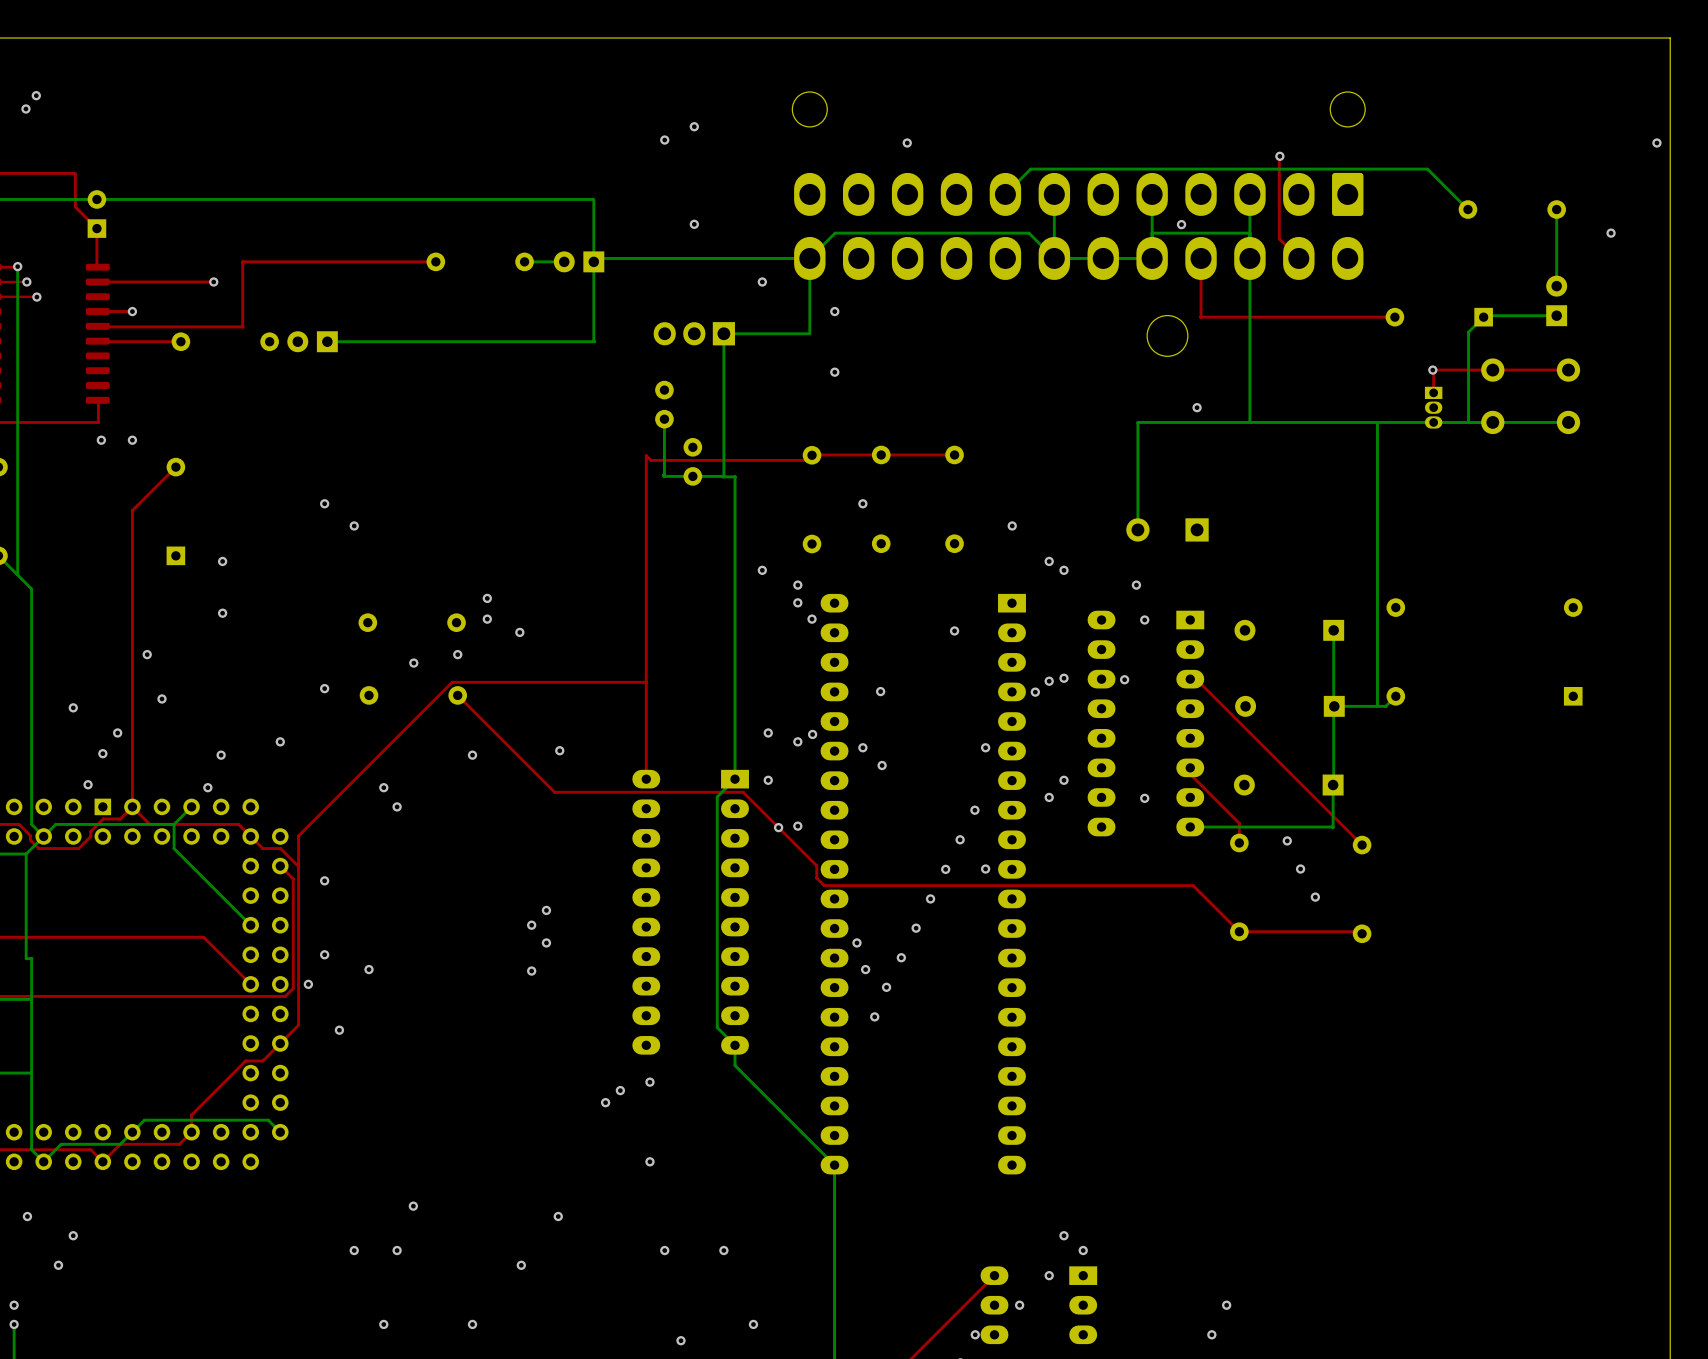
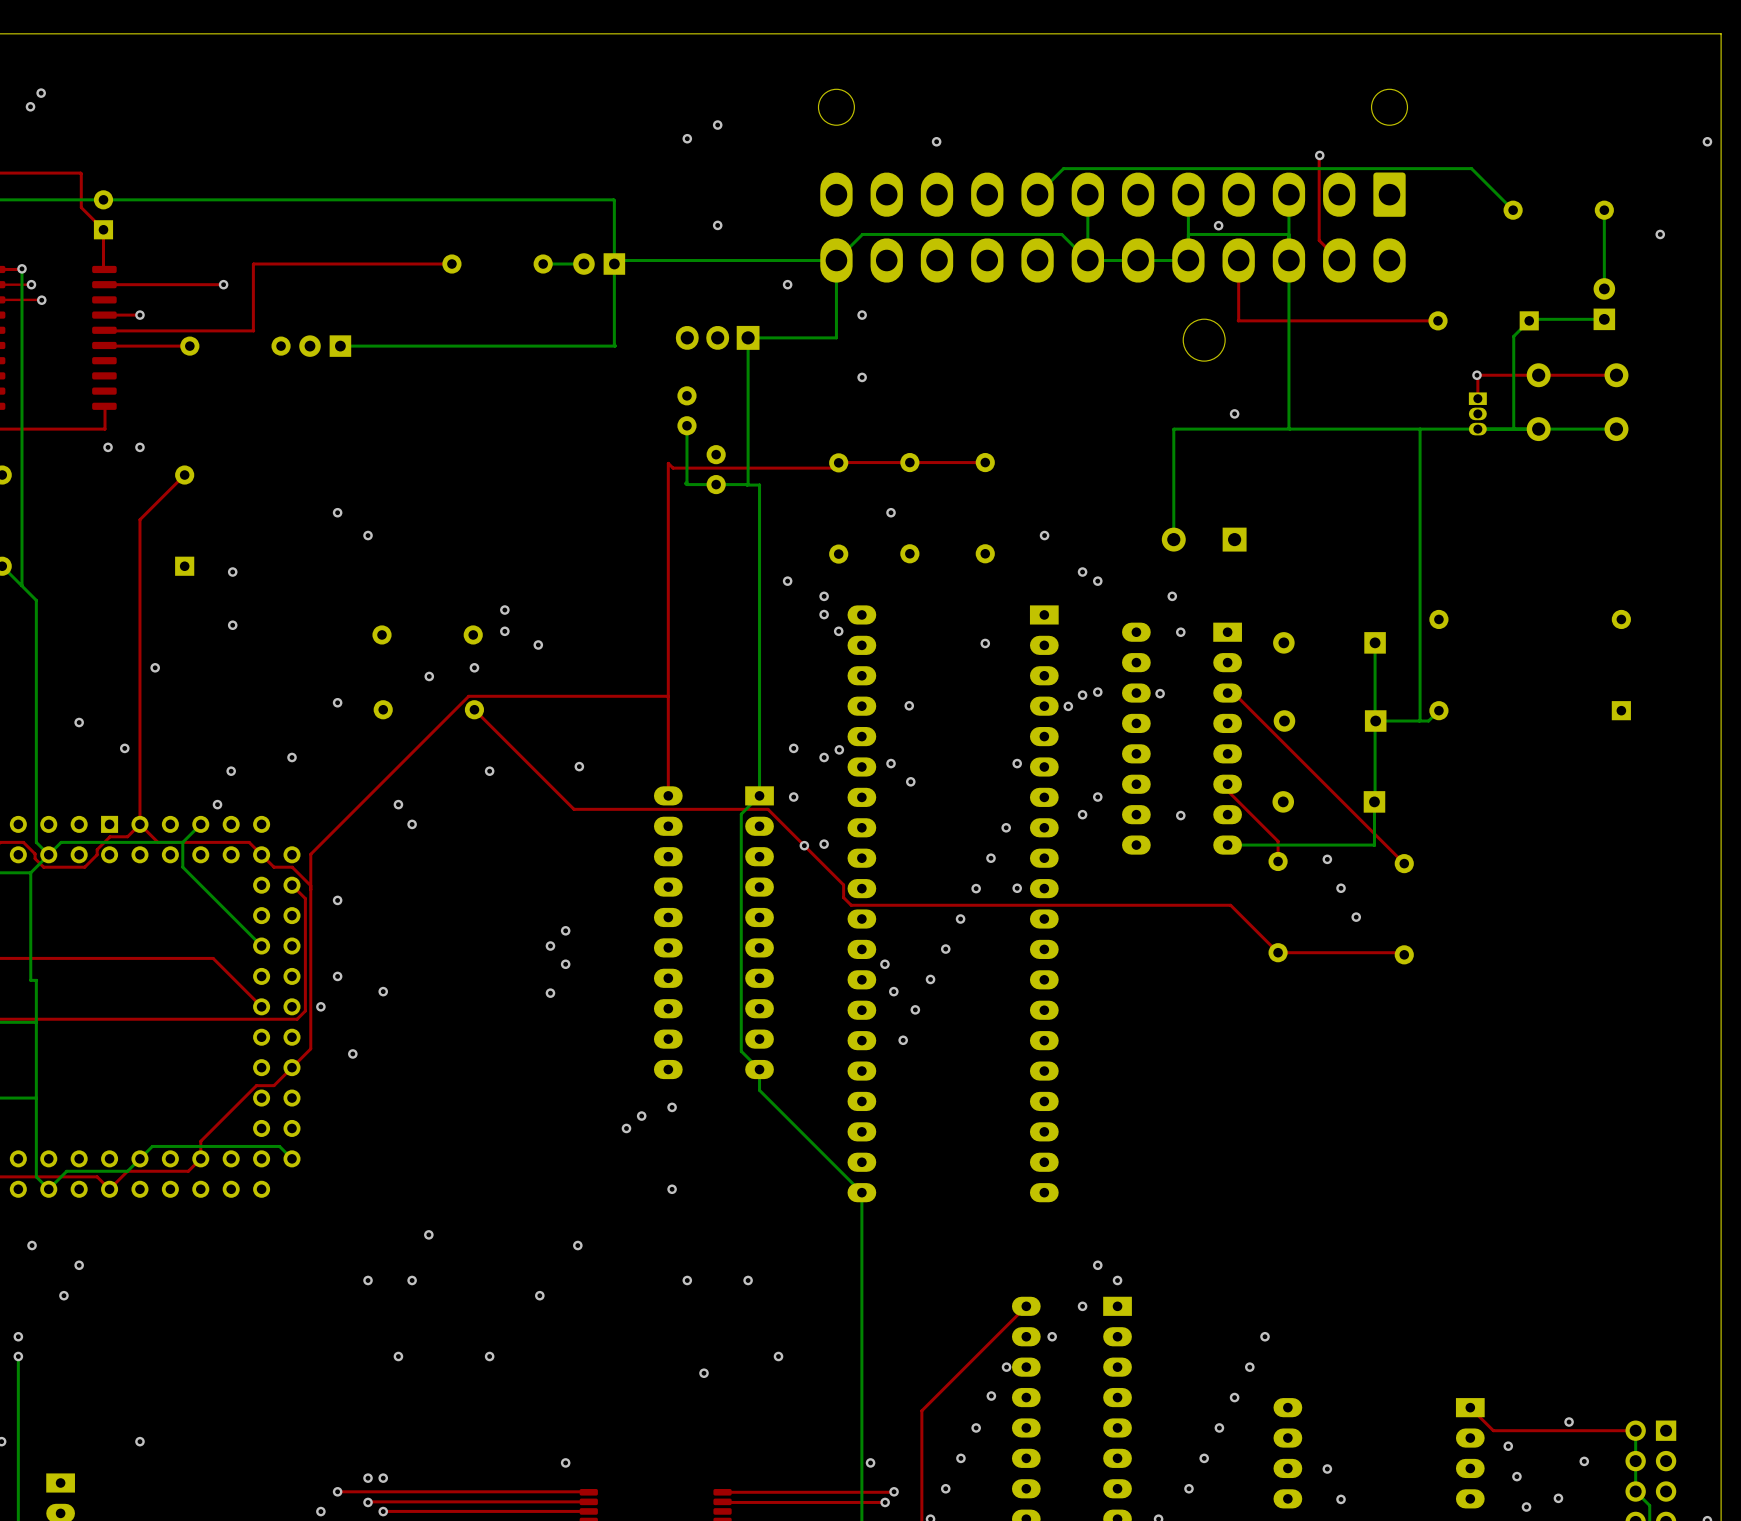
via: (161, 698) -> none
via: (102, 753) -> none
via: (88, 784) -> none

